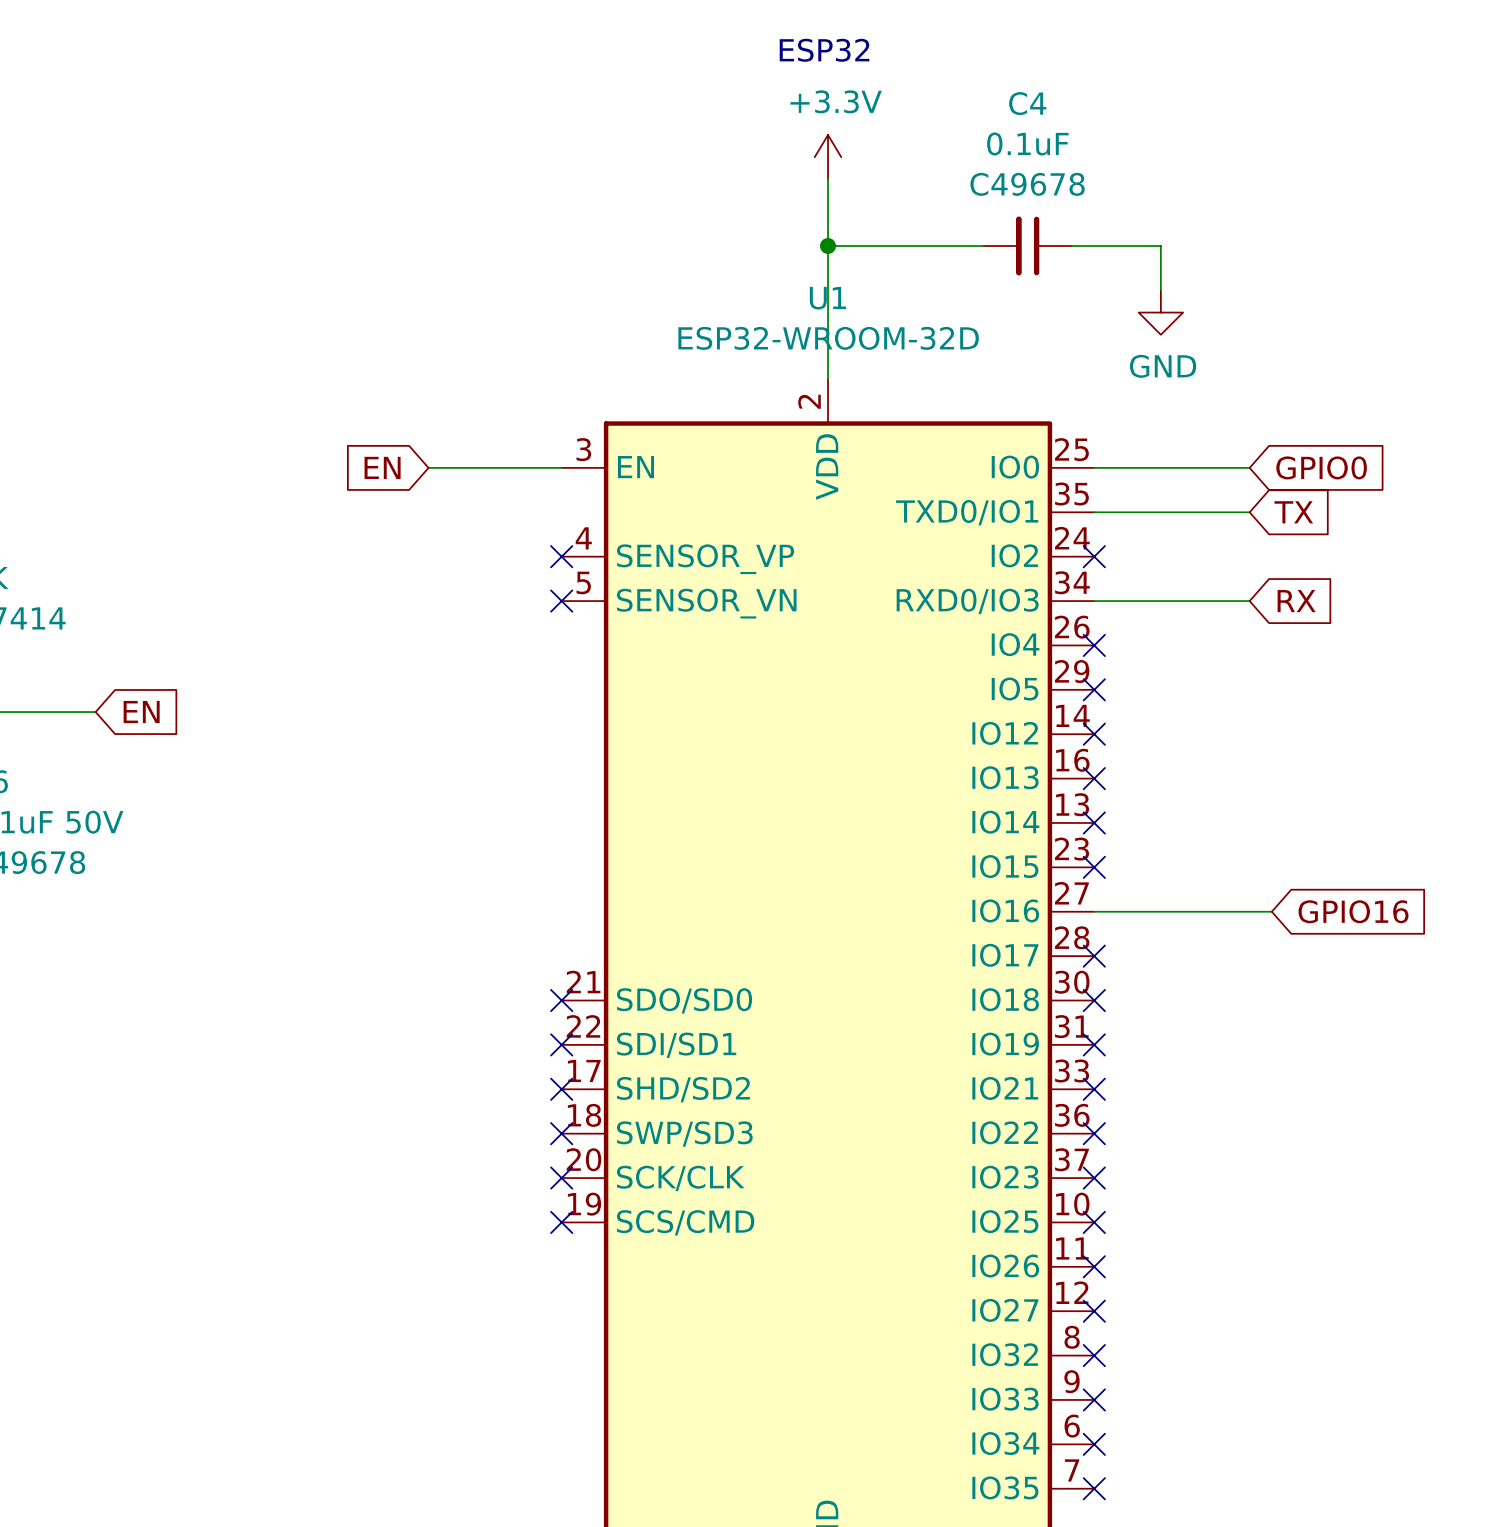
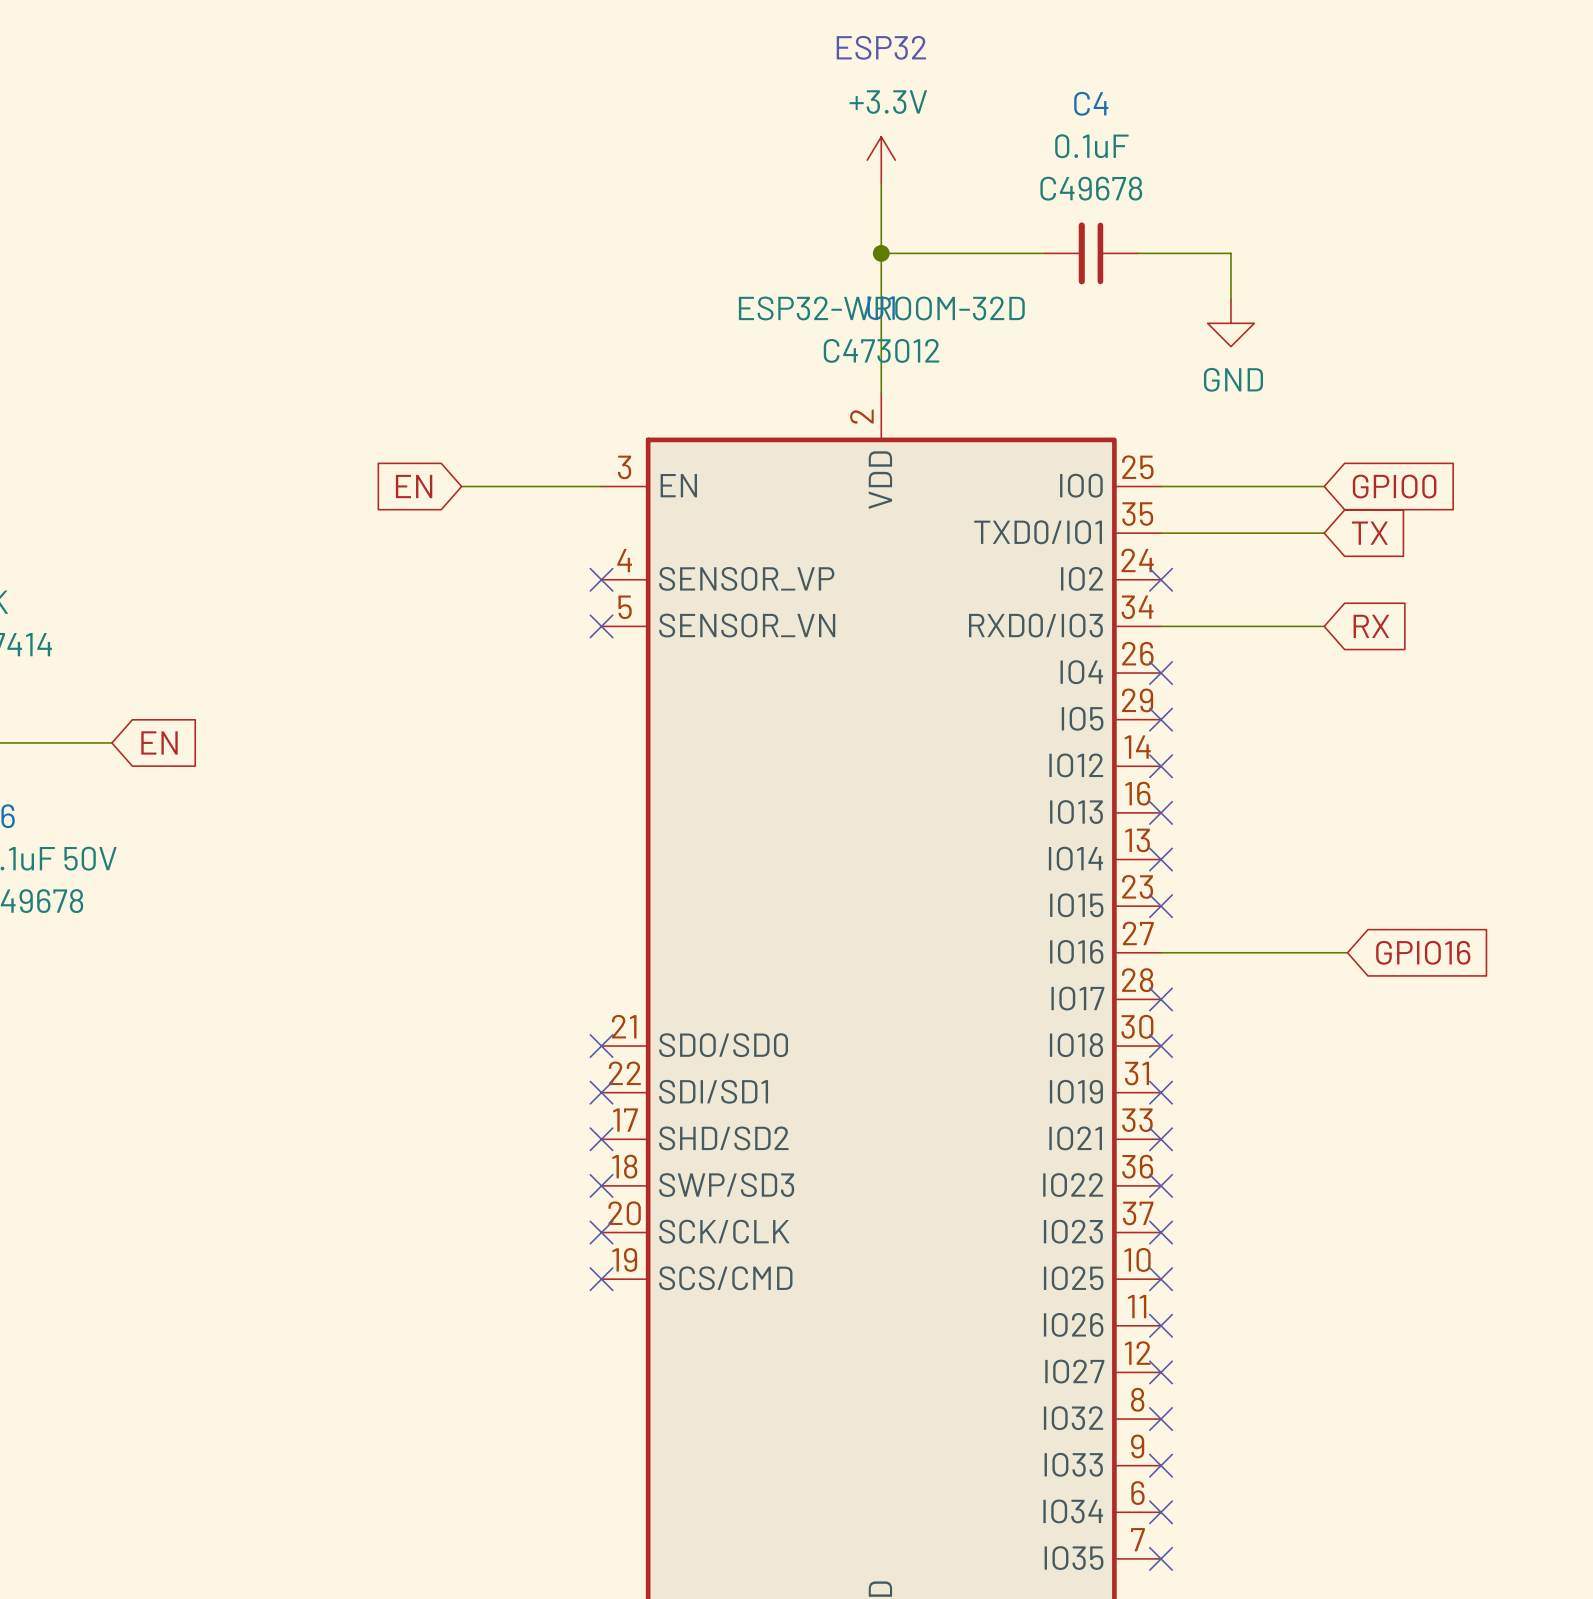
U1 text: none -> C473012 (881, 350)
U1 value position: ESP32-WROOM-32D (828, 338) -> ESP32-WROOM-32D (881, 308)

